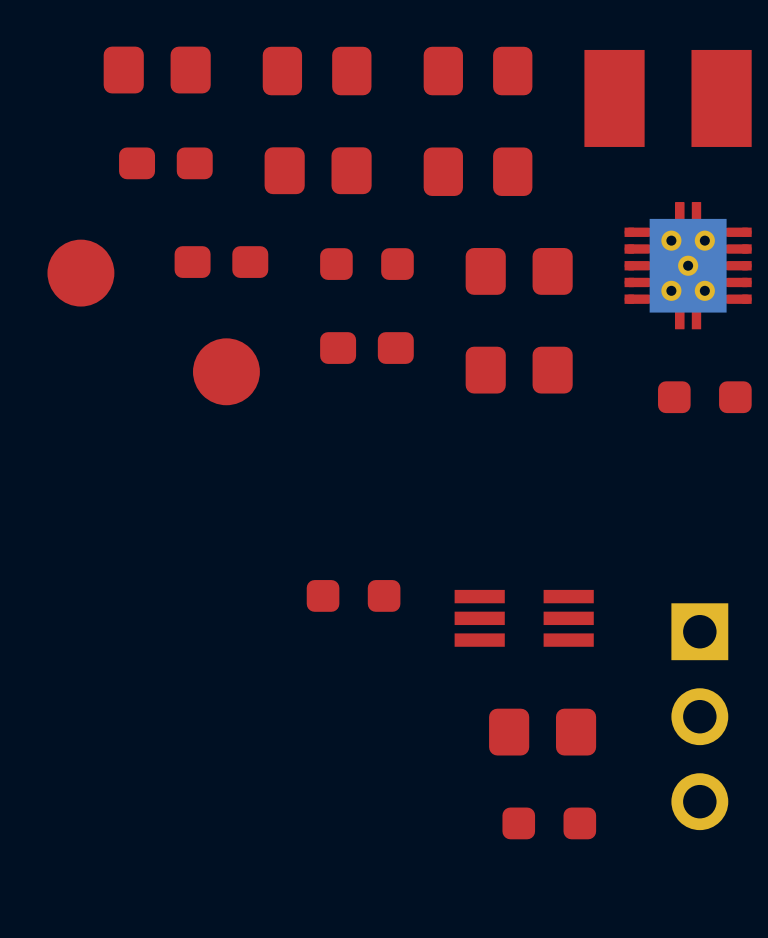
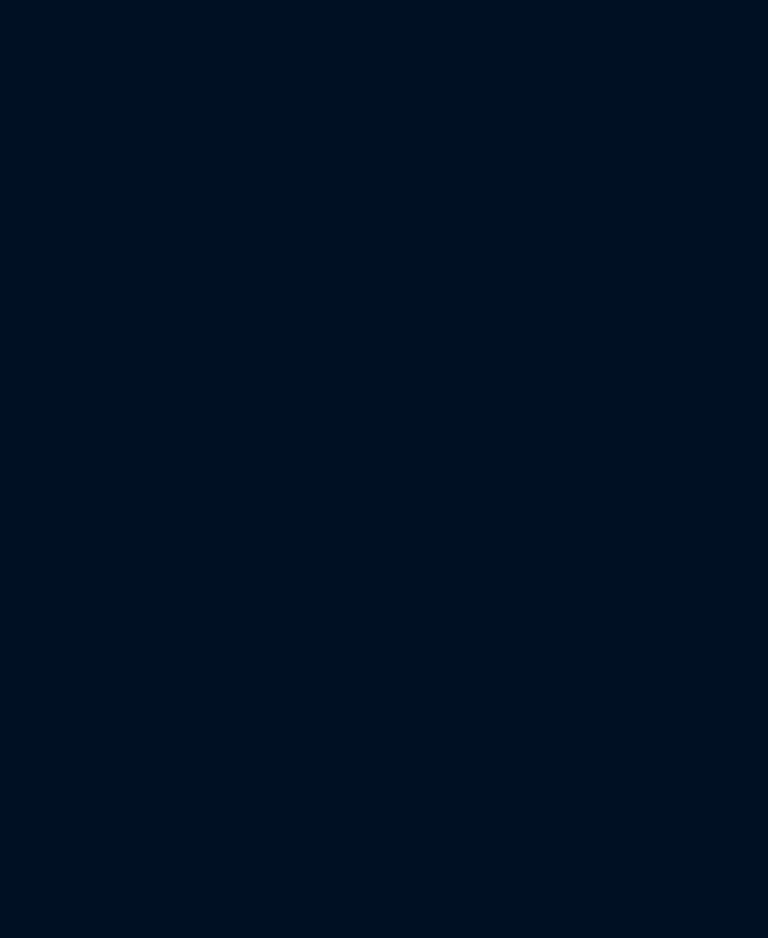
part: (157, 70) -> none
part: (317, 71) -> none
part: (478, 71) -> none
part: (668, 98) -> none
part: (165, 163) -> none
part: (318, 170) -> none
part: (478, 171) -> none
part: (221, 262) -> none
part: (366, 264) -> none
part: (688, 265) -> none
part: (519, 271) -> none
part: (80, 273) -> none
part: (366, 348) -> none
part: (519, 370) -> none
part: (226, 371) -> none
part: (704, 397) -> none
part: (353, 595) -> none
part: (524, 618) -> none
part: (699, 716) -> none
part: (542, 732) -> none
part: (549, 823) -> none

